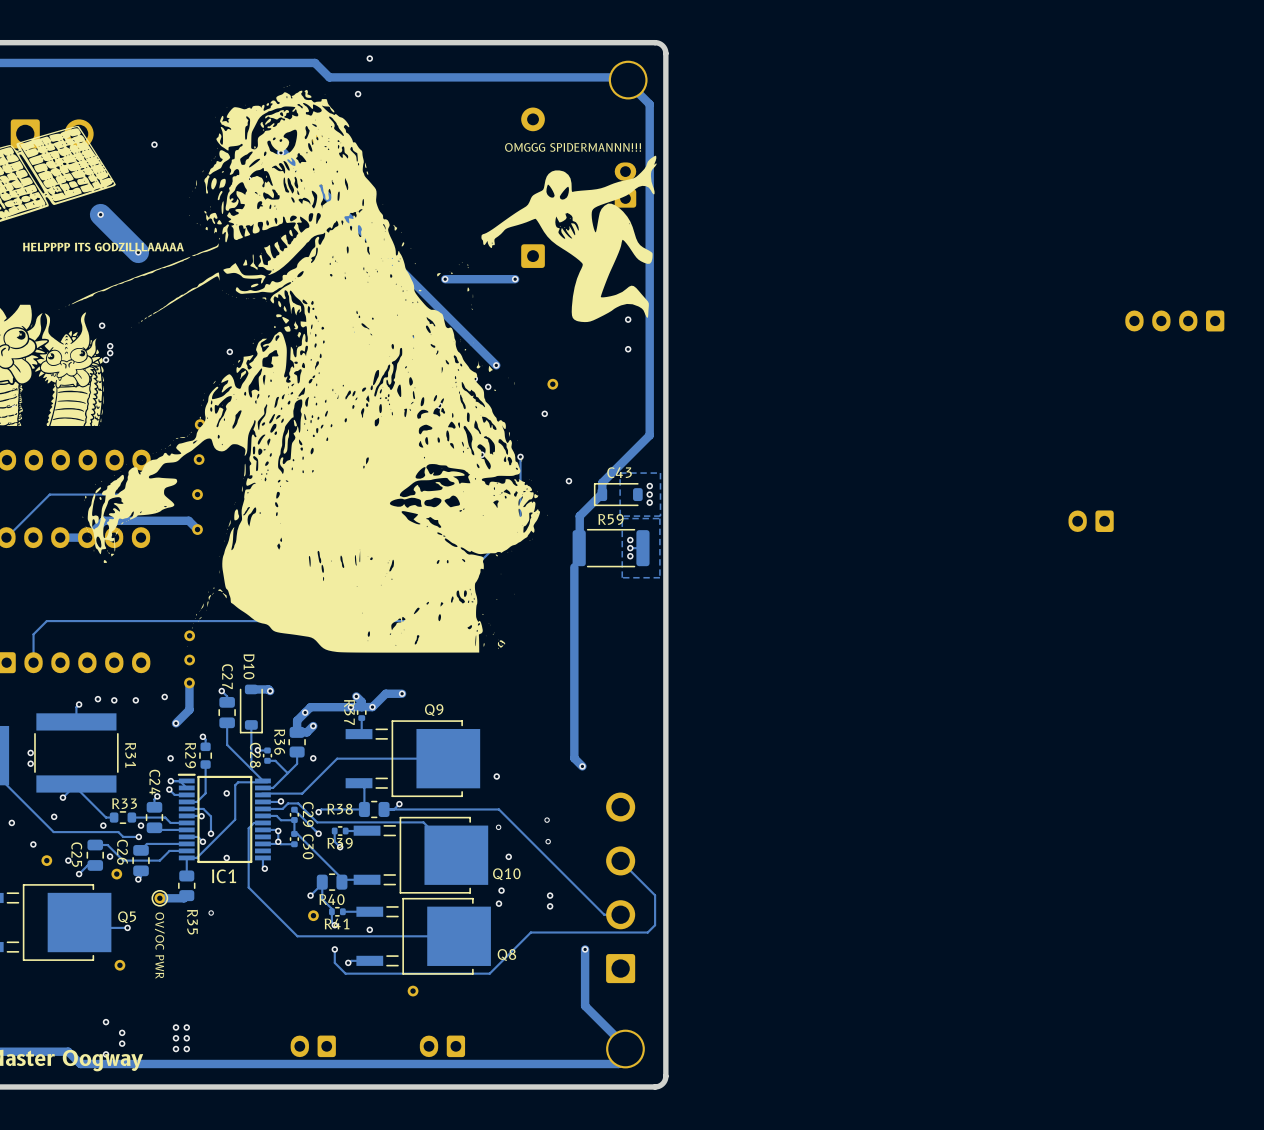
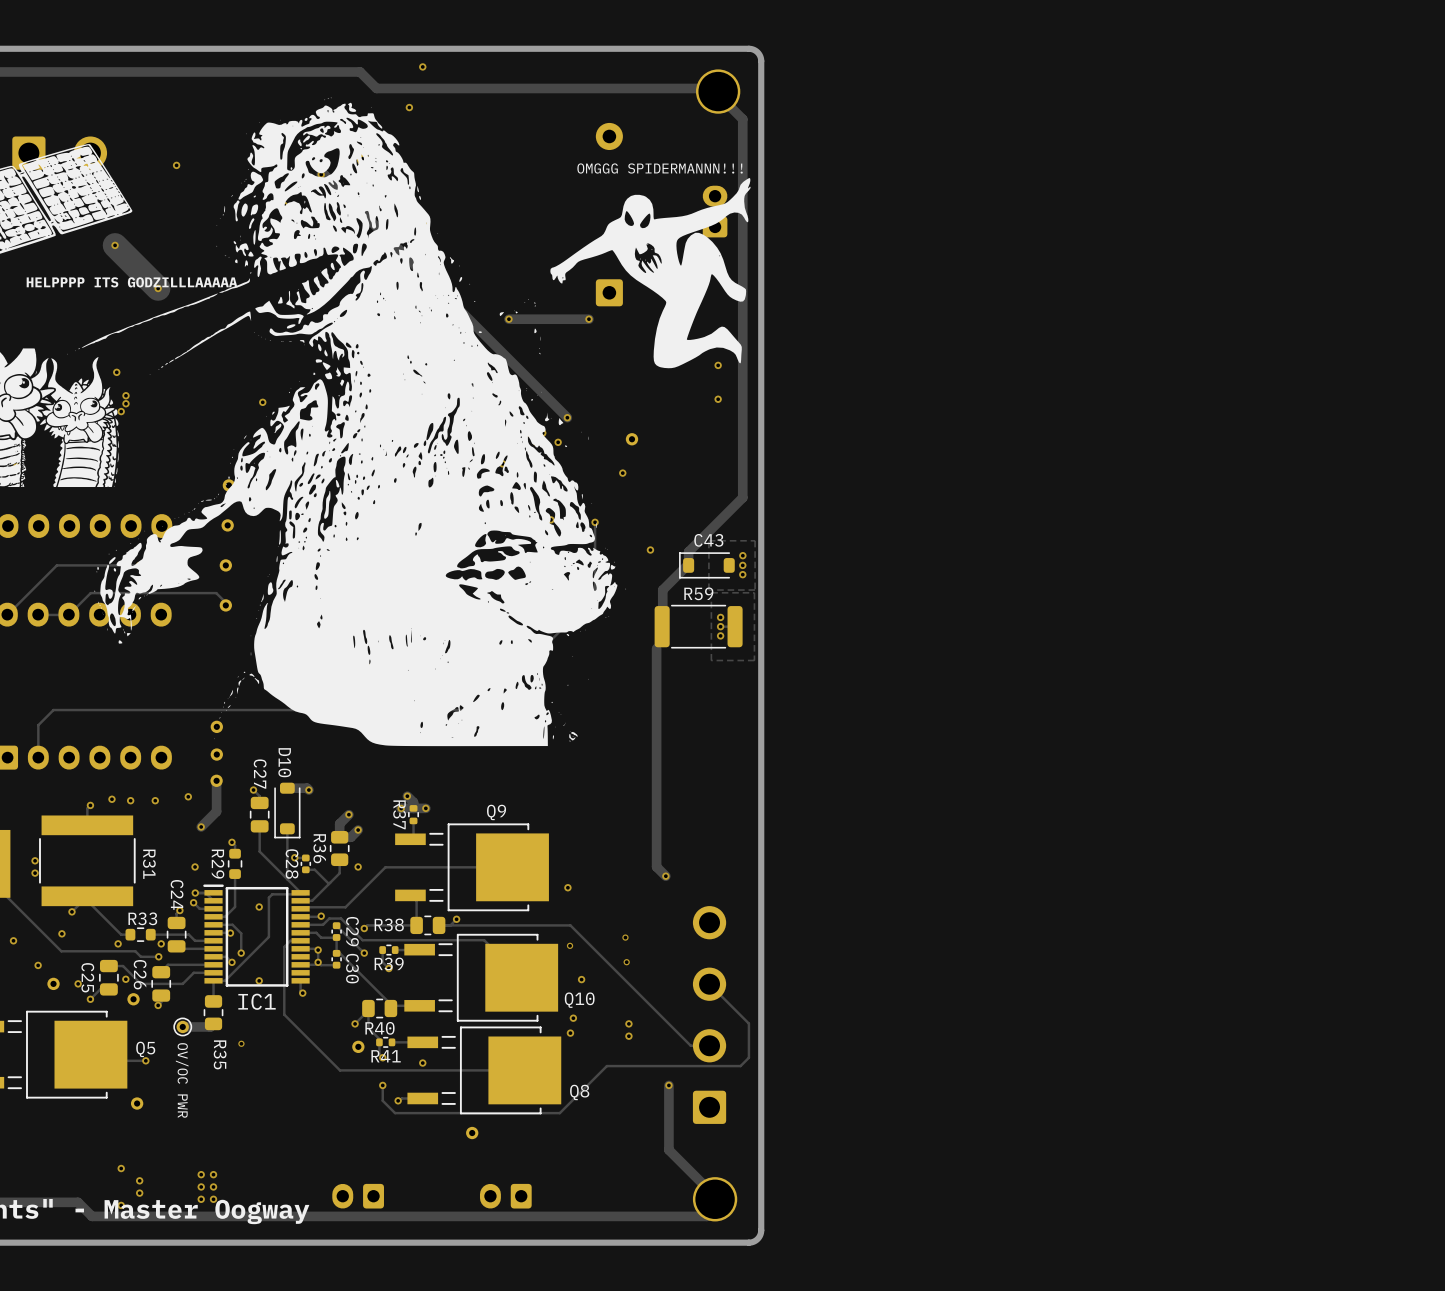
part: (1174, 320) -> none
part: (1091, 521) -> none
track: none -> (227, 604) (216, 593) (90, 593) (68, 614) (38, 614)
track: (197, 529) (188, 520) (104, 520) (87, 537) (60, 537) -> none
track: (402, 693) (385, 693) (372, 707) -> none
via: (402, 693) -> none
track: (350, 707) (310, 707) (305, 712) -> none

